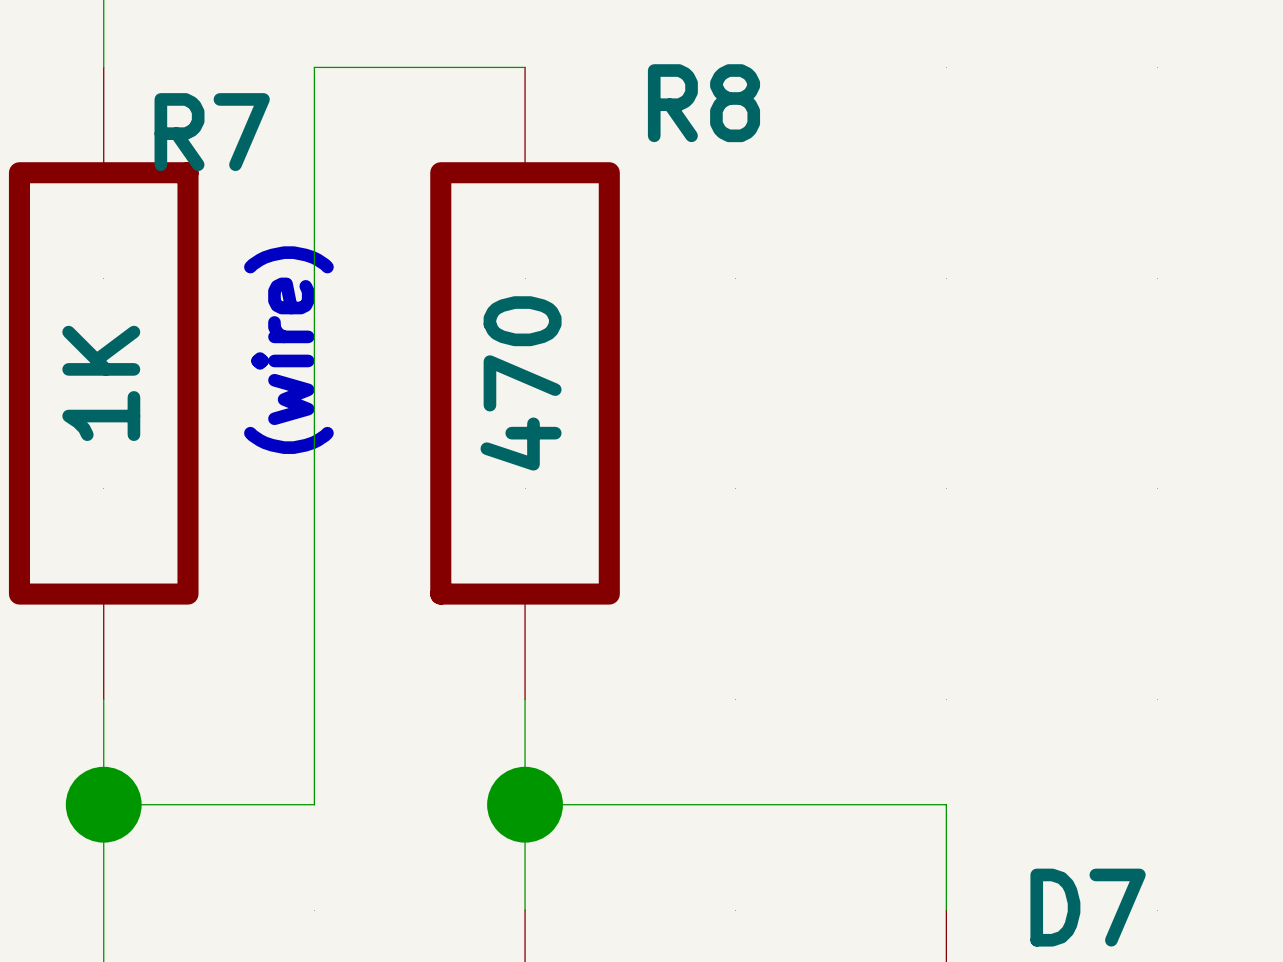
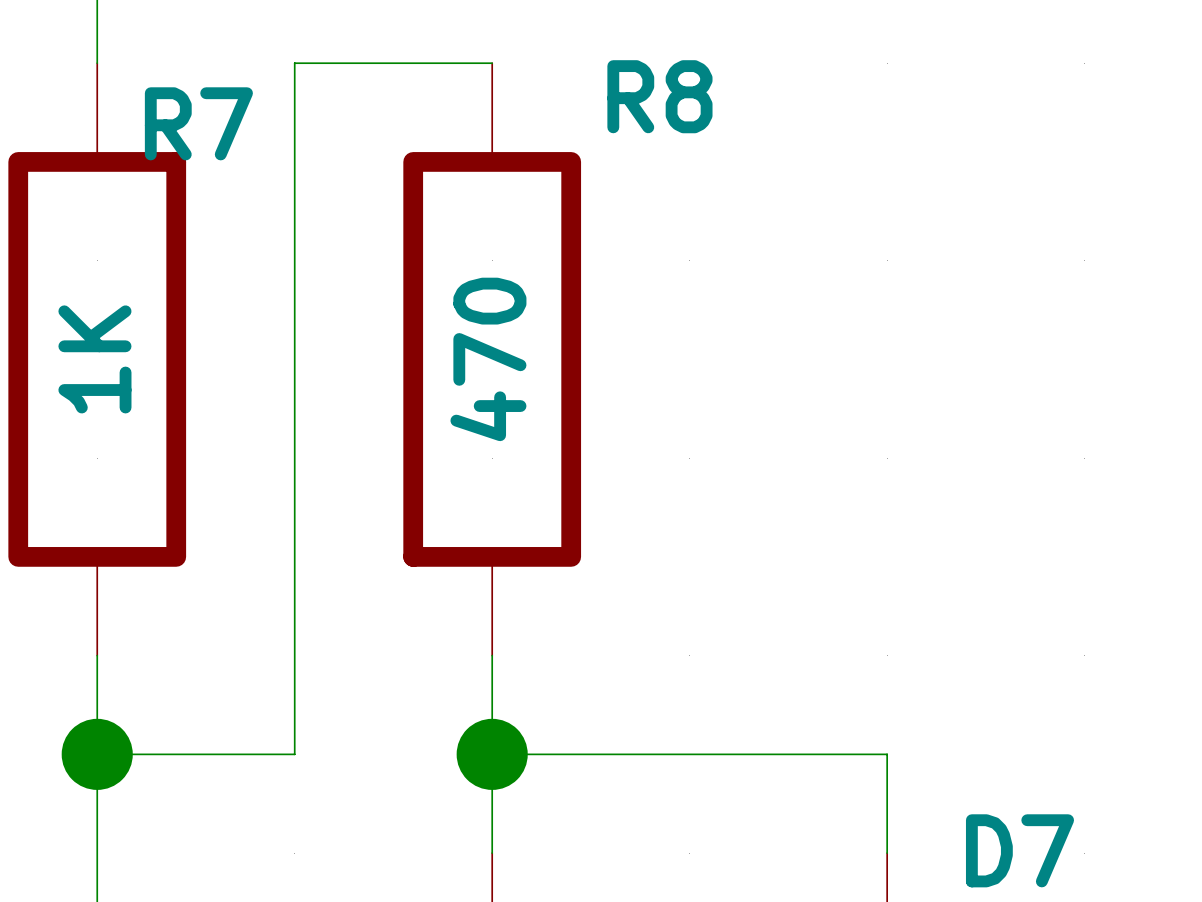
text: (wire) (288, 350) -> none

